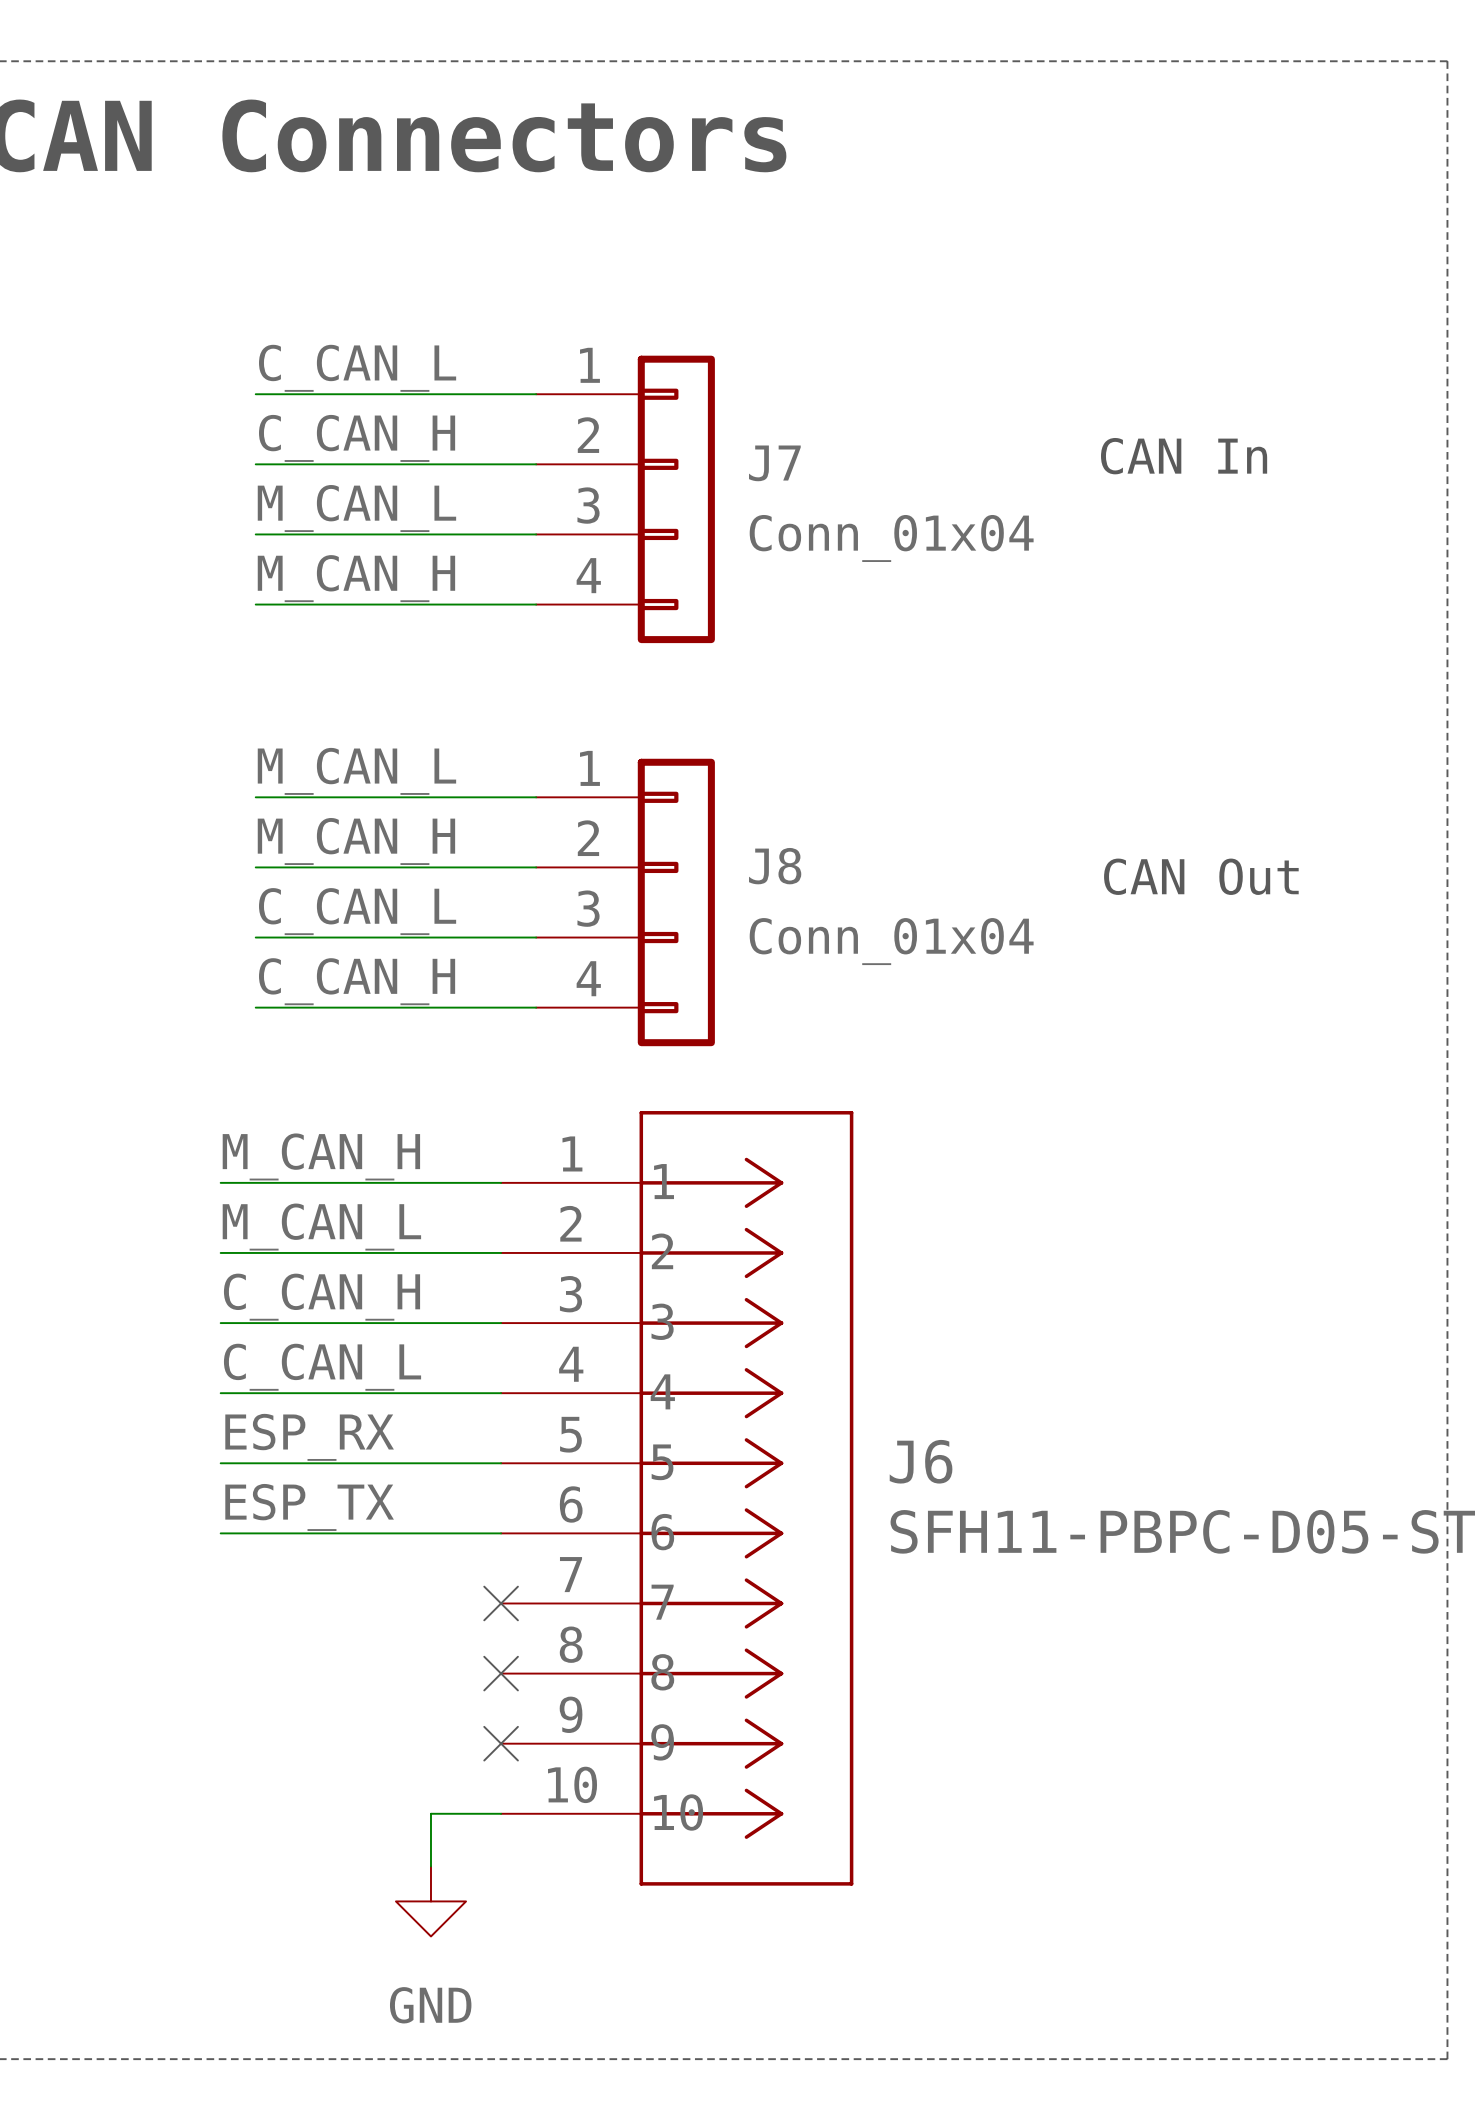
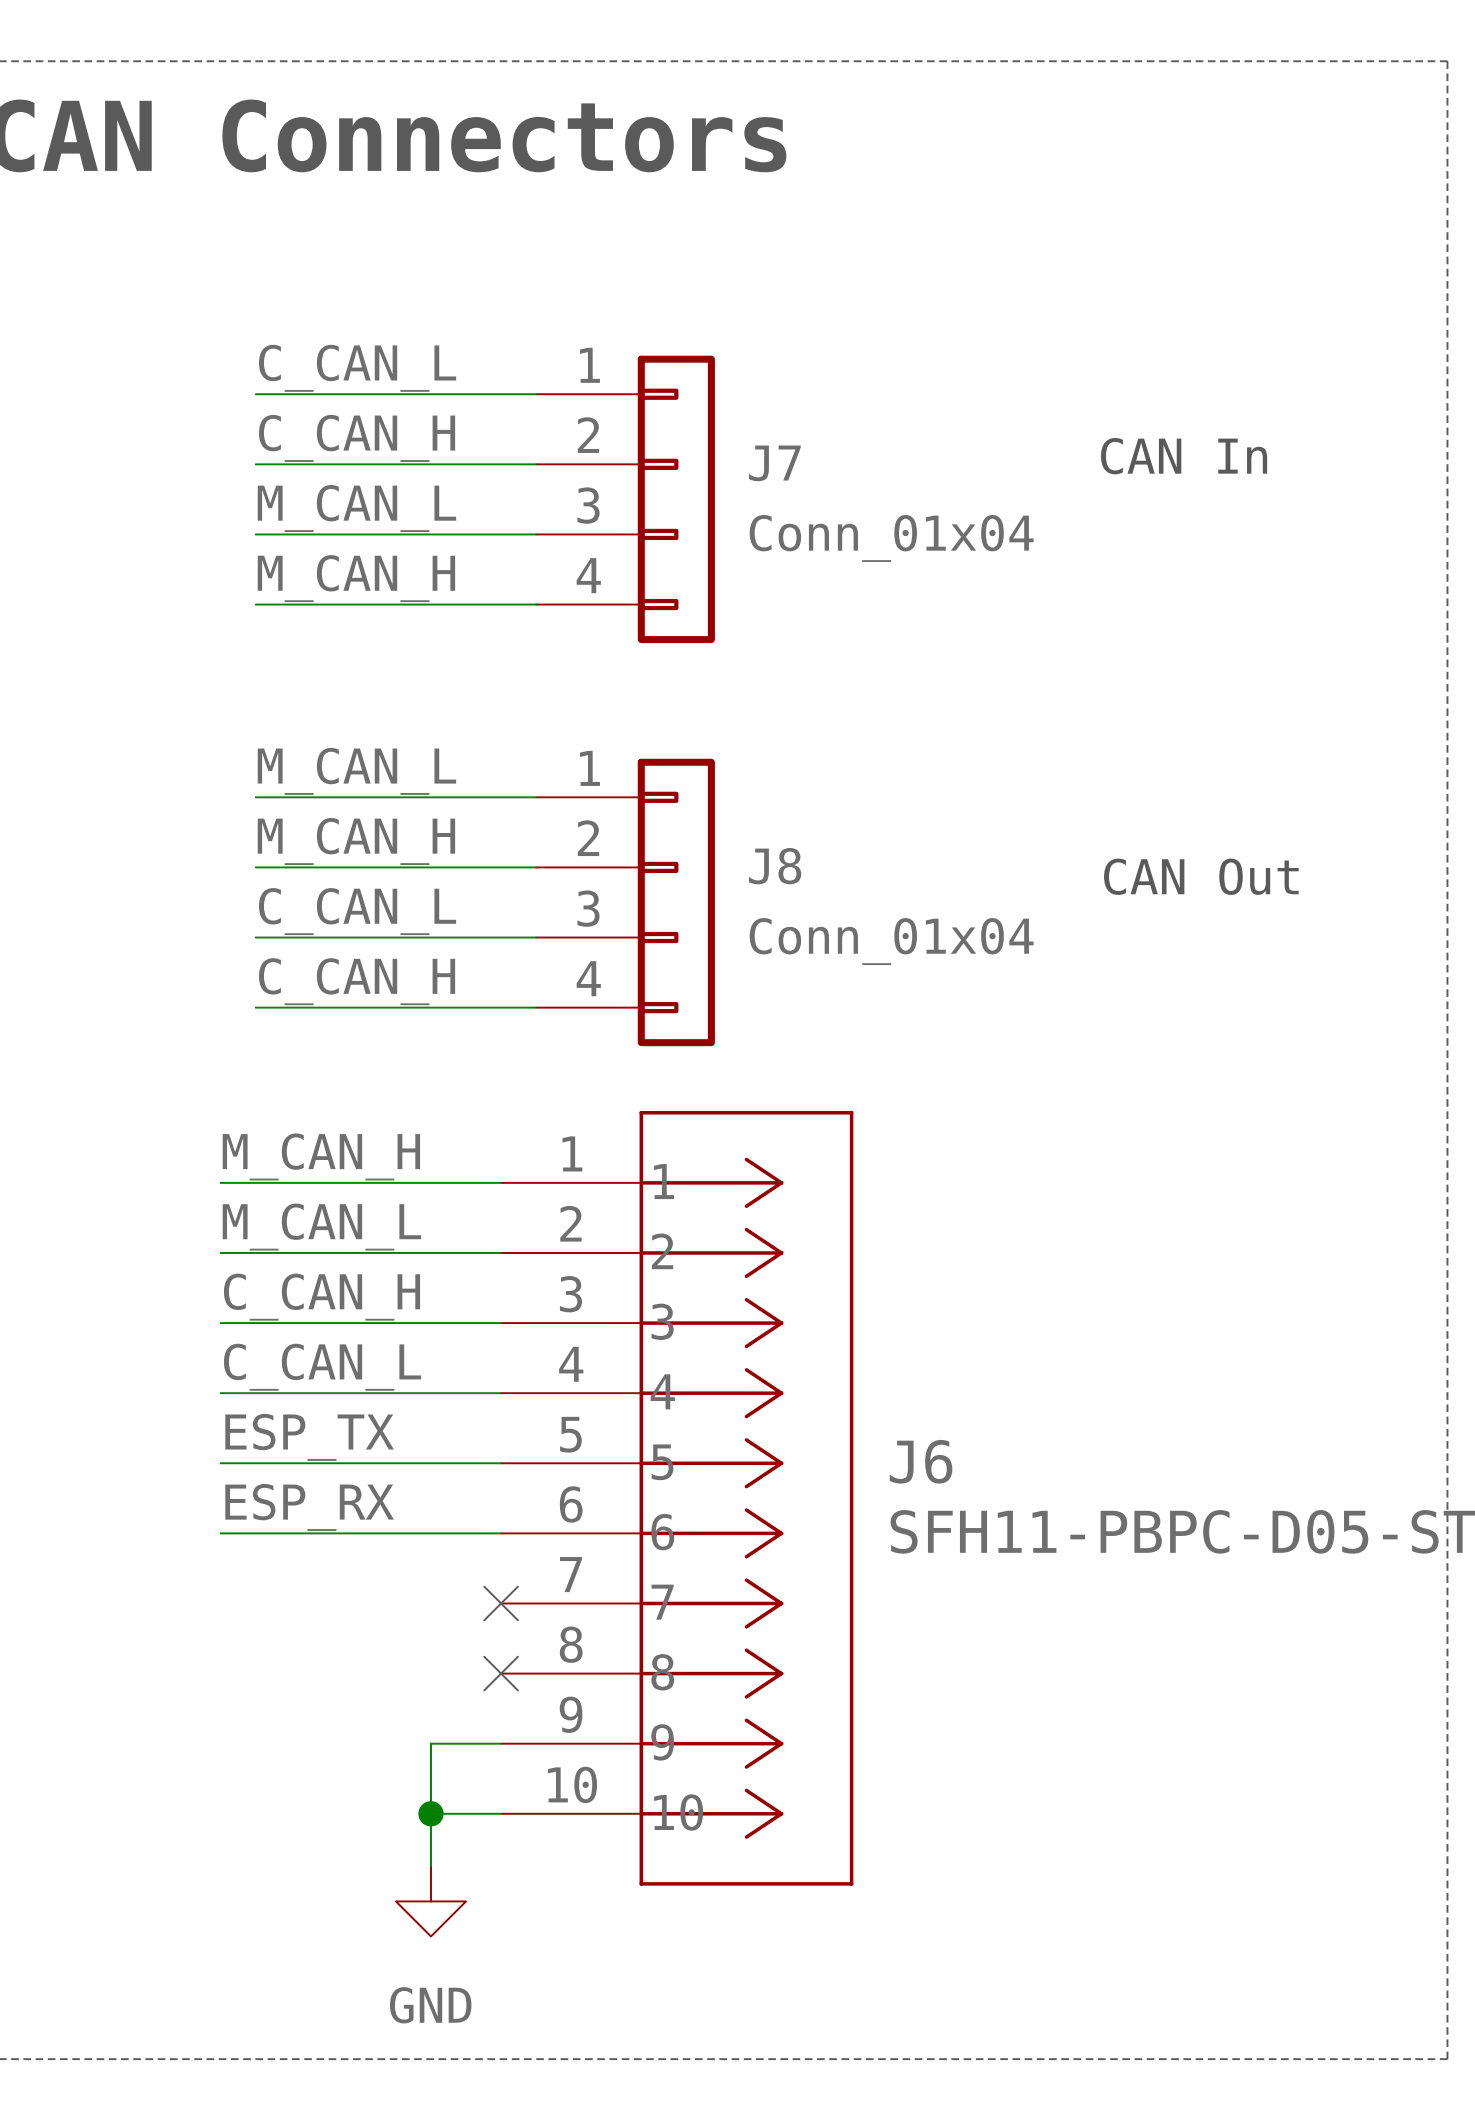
label: ESP_RX (309, 1437) -> ESP_TX (309, 1437)
label: ESP_TX (309, 1507) -> ESP_RX (309, 1507)
wire: none -> (501, 1743) (430, 1743) (430, 1813)
no-connect mark: (501, 1743) -> none
junction: none -> (430, 1813)

